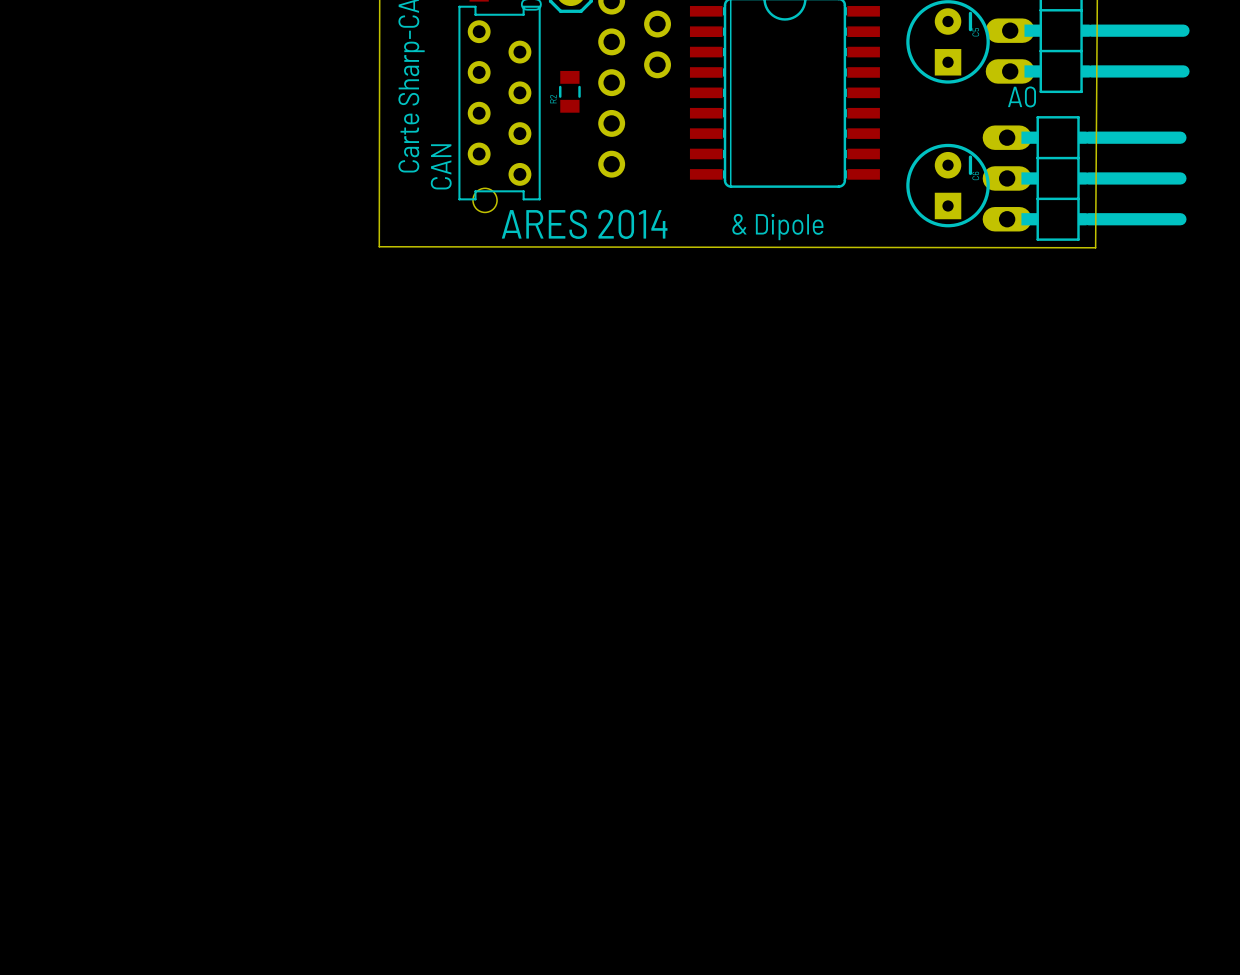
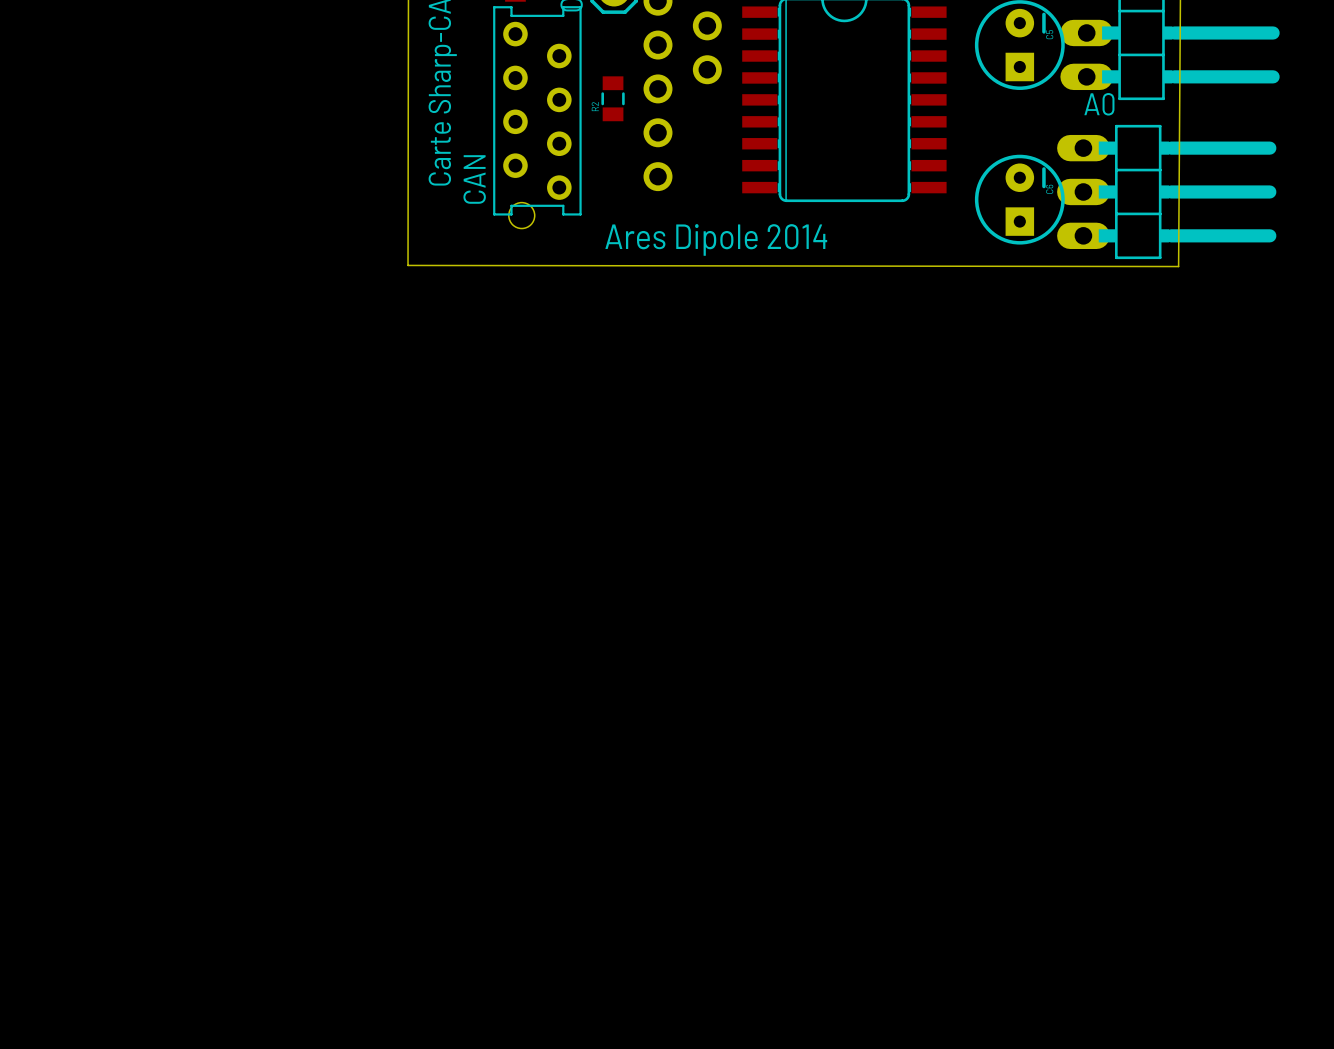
text: none -> Ares Dipole 2014 (716, 239)
text: ARES 2014 (584, 224) -> none
text: & Dipole (777, 227) -> none

